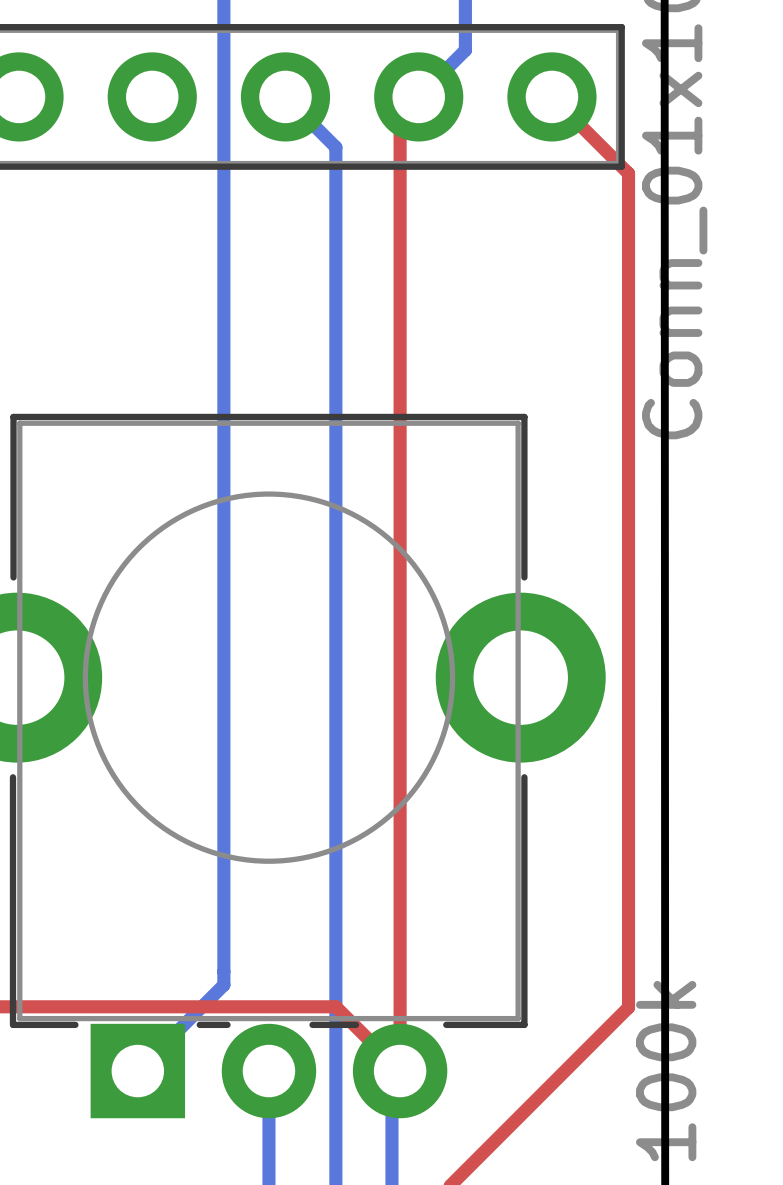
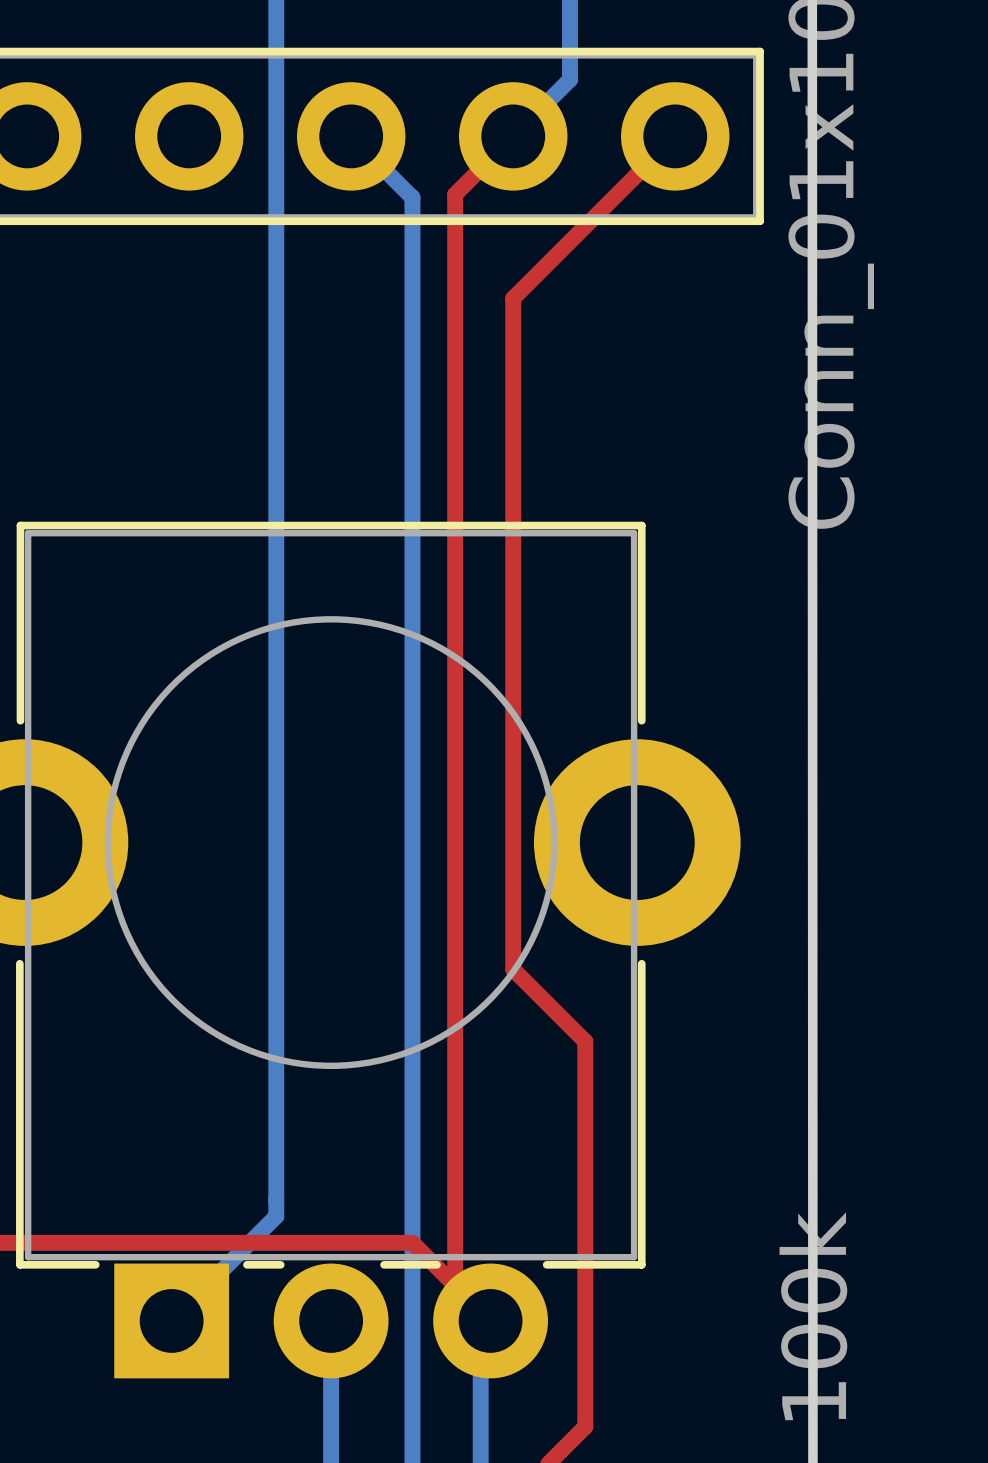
top track: (551, 96) (628, 173) (628, 1007) (477, 1158) -> (675, 136) (513, 298) (513, 969) (585, 1041) (585, 1426)
top track: (400, 115) (400, 1071) -> (490, 159) (455, 194) (455, 1285)

